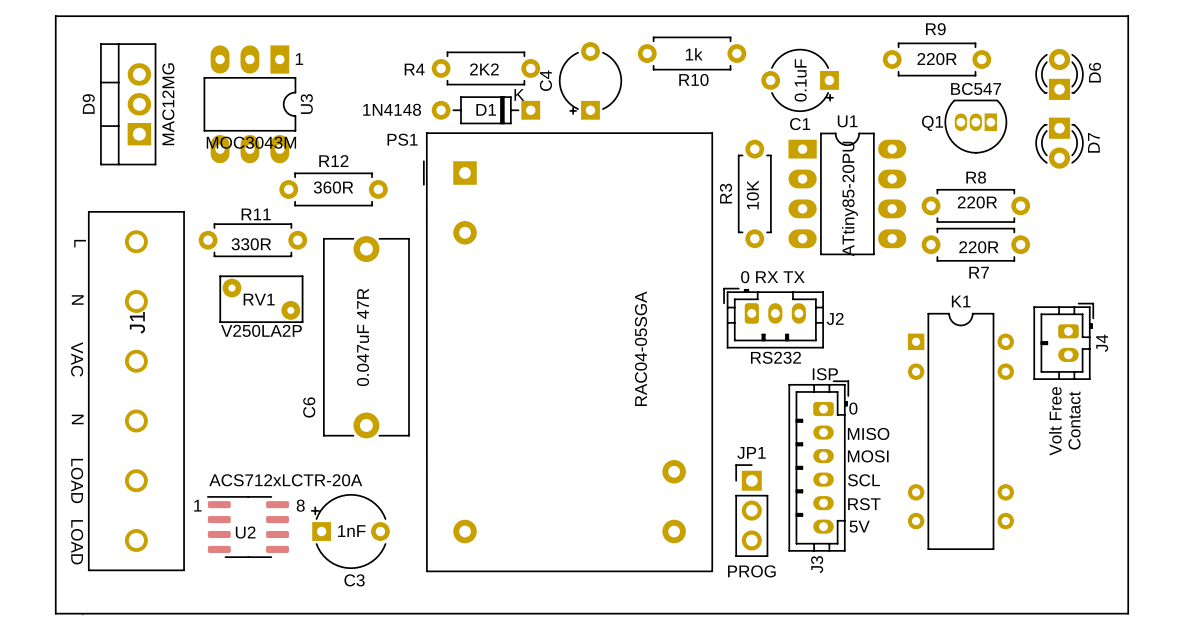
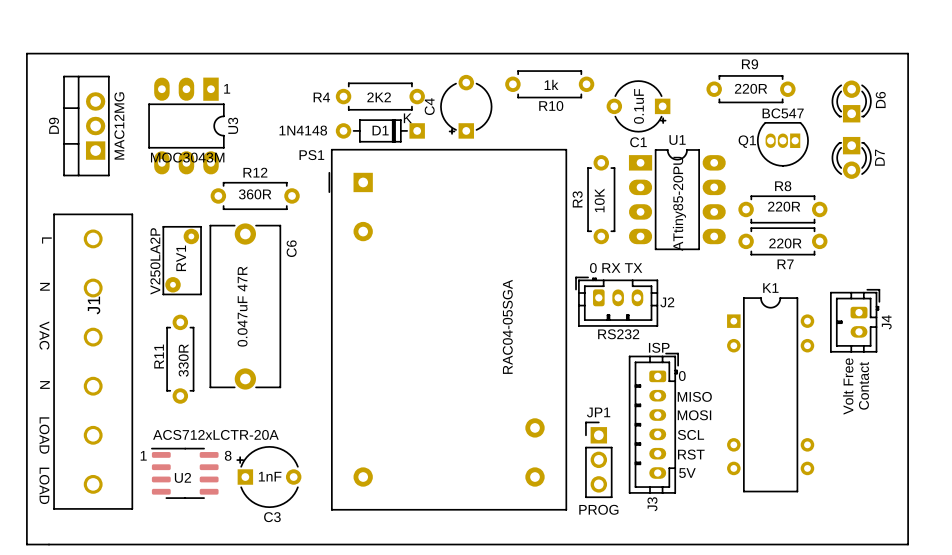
R11 name position: R11 (256, 214) -> R11 (159, 356)
R11 rotation: 0° (252, 240) -> 90° clockwise (180, 359)
R11 position: (252, 240) -> (180, 359)
RV1 rotation: 0° (261, 299) -> 90° clockwise (182, 260)
C6 position: (366, 337) -> (245, 306)
C6 name position: C6 (309, 407) -> C6 (291, 248)

